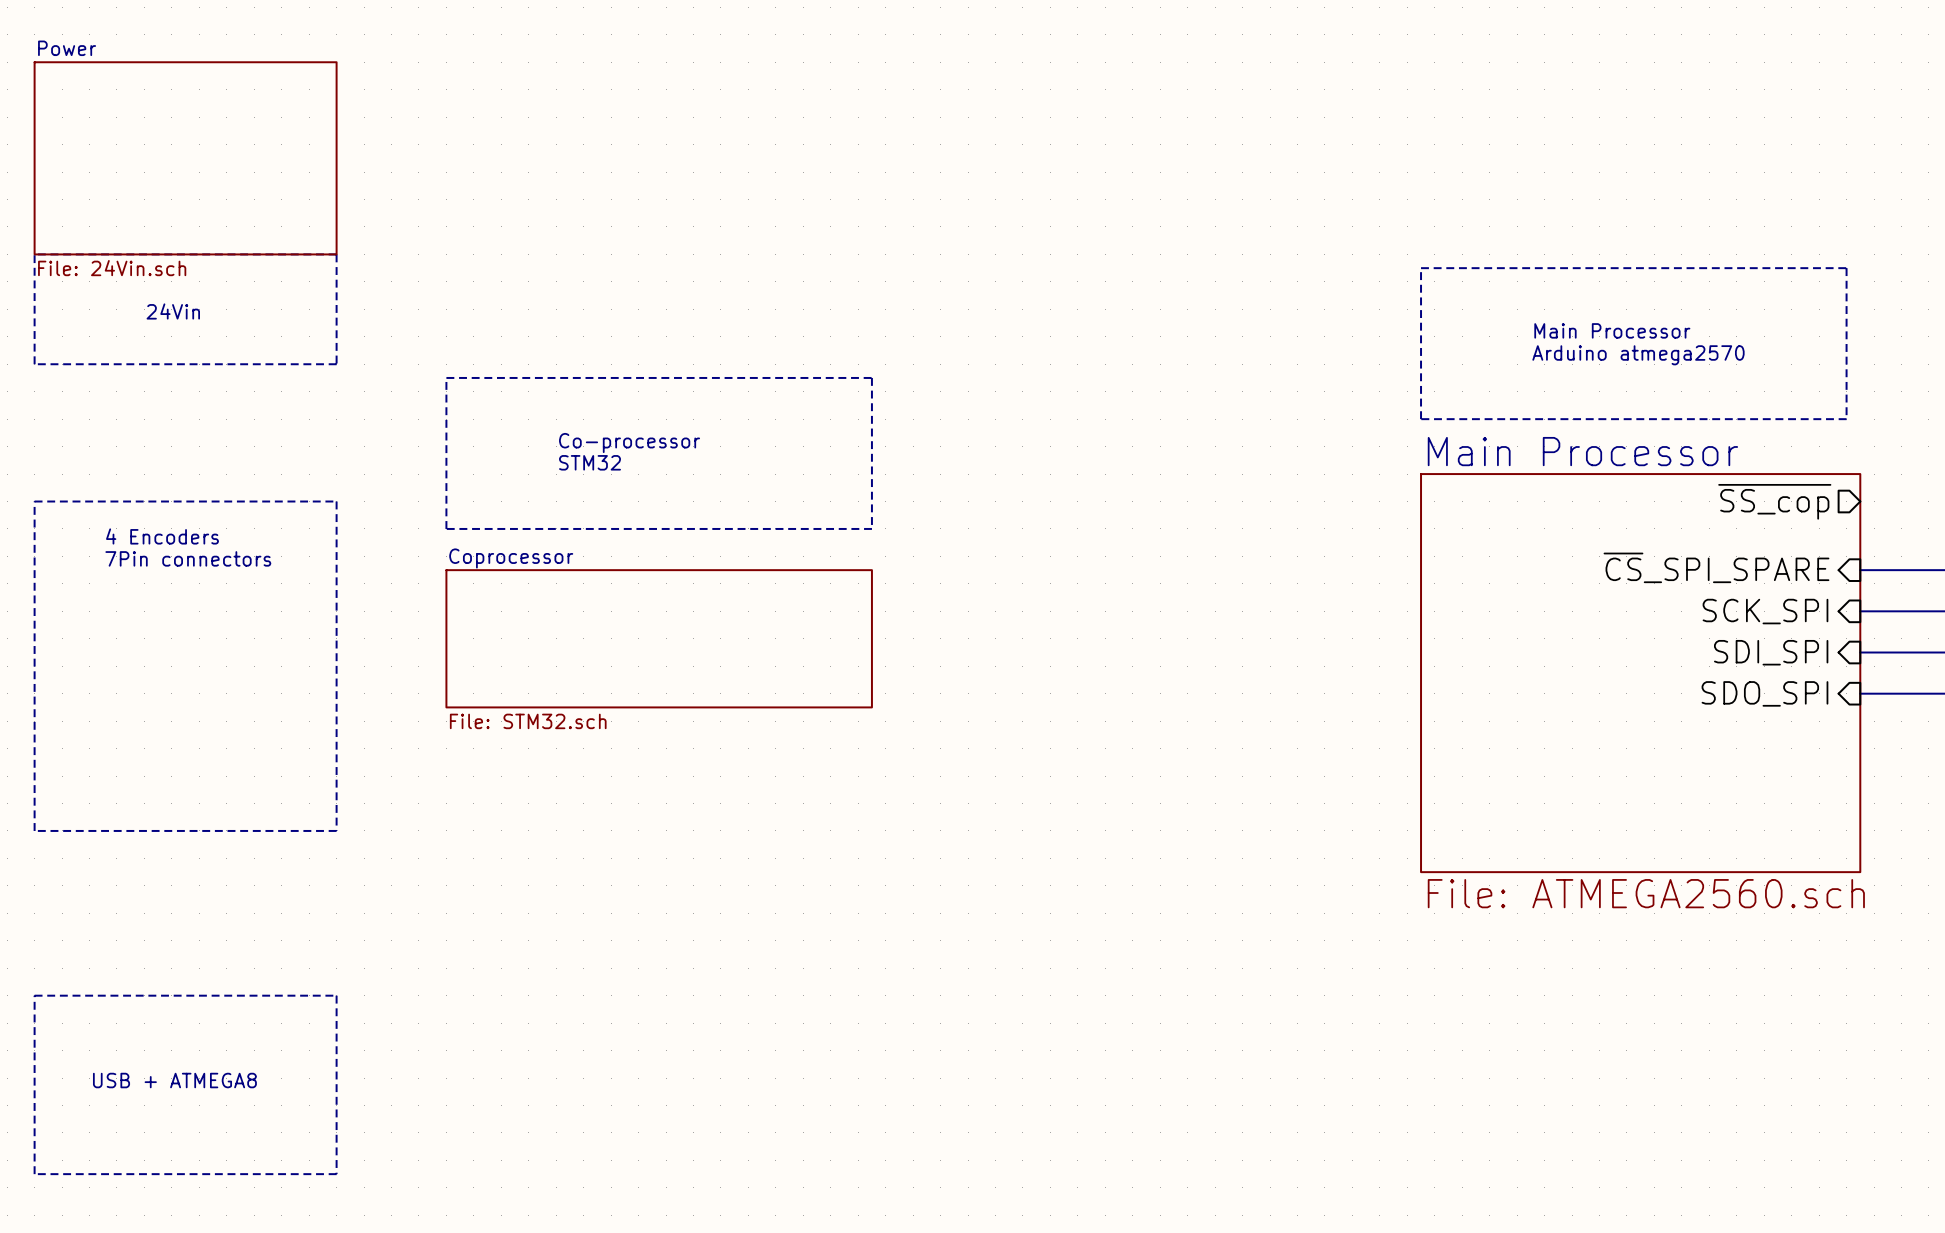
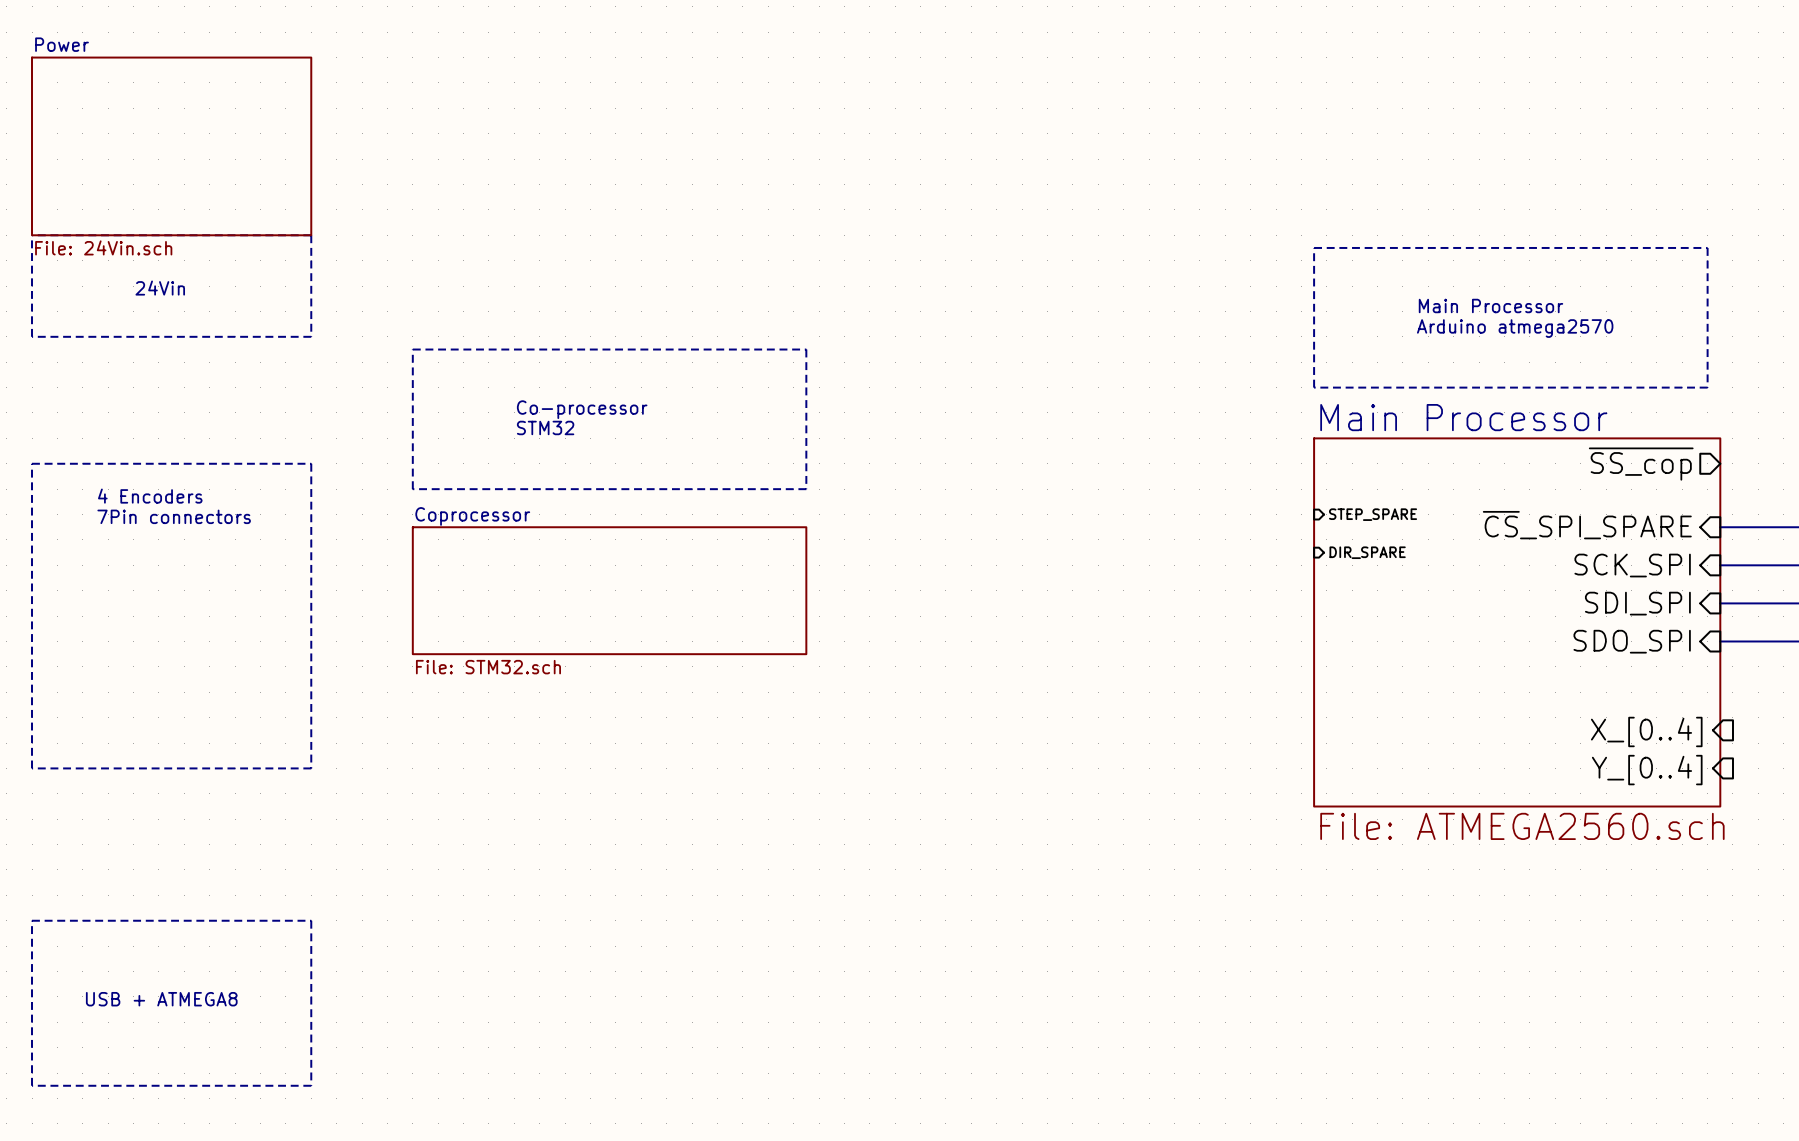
sheet pin: none -> STEP_SPARE (1373, 514)
sheet pin: none -> DIR_SPARE (1367, 552)
sheet pin: none -> X_[0..4] (1646, 731)
sheet pin: none -> Y_[0..4] (1647, 770)

